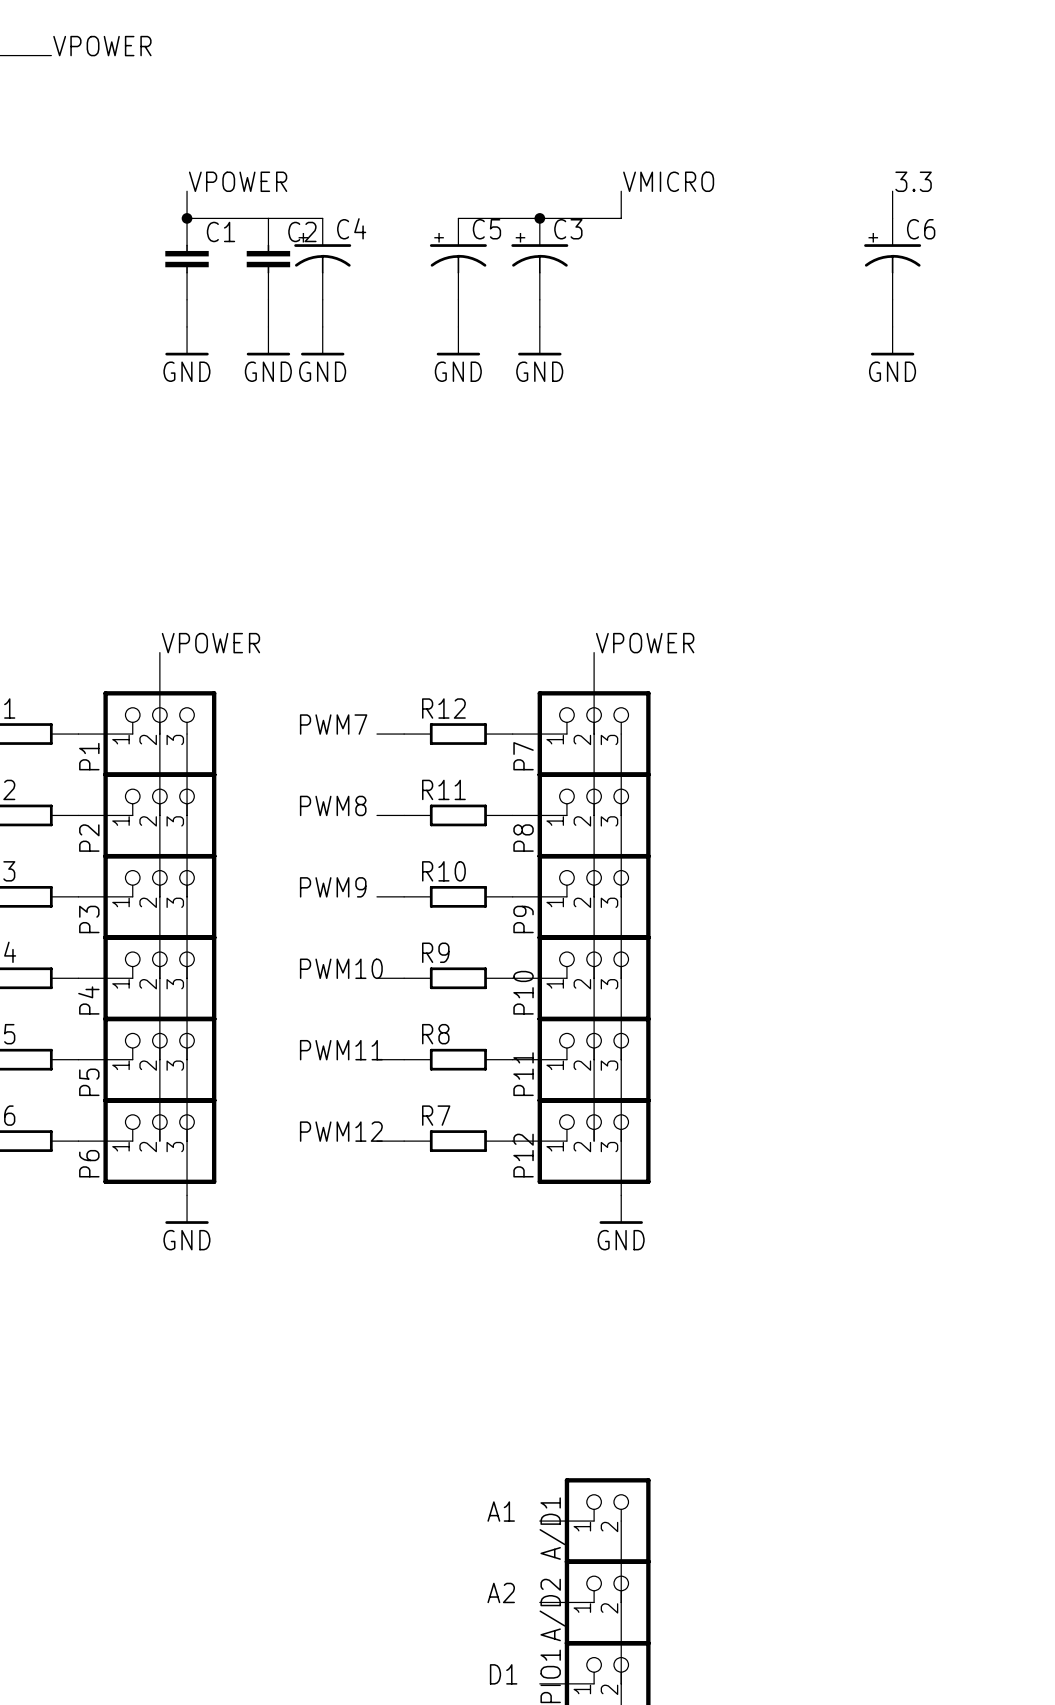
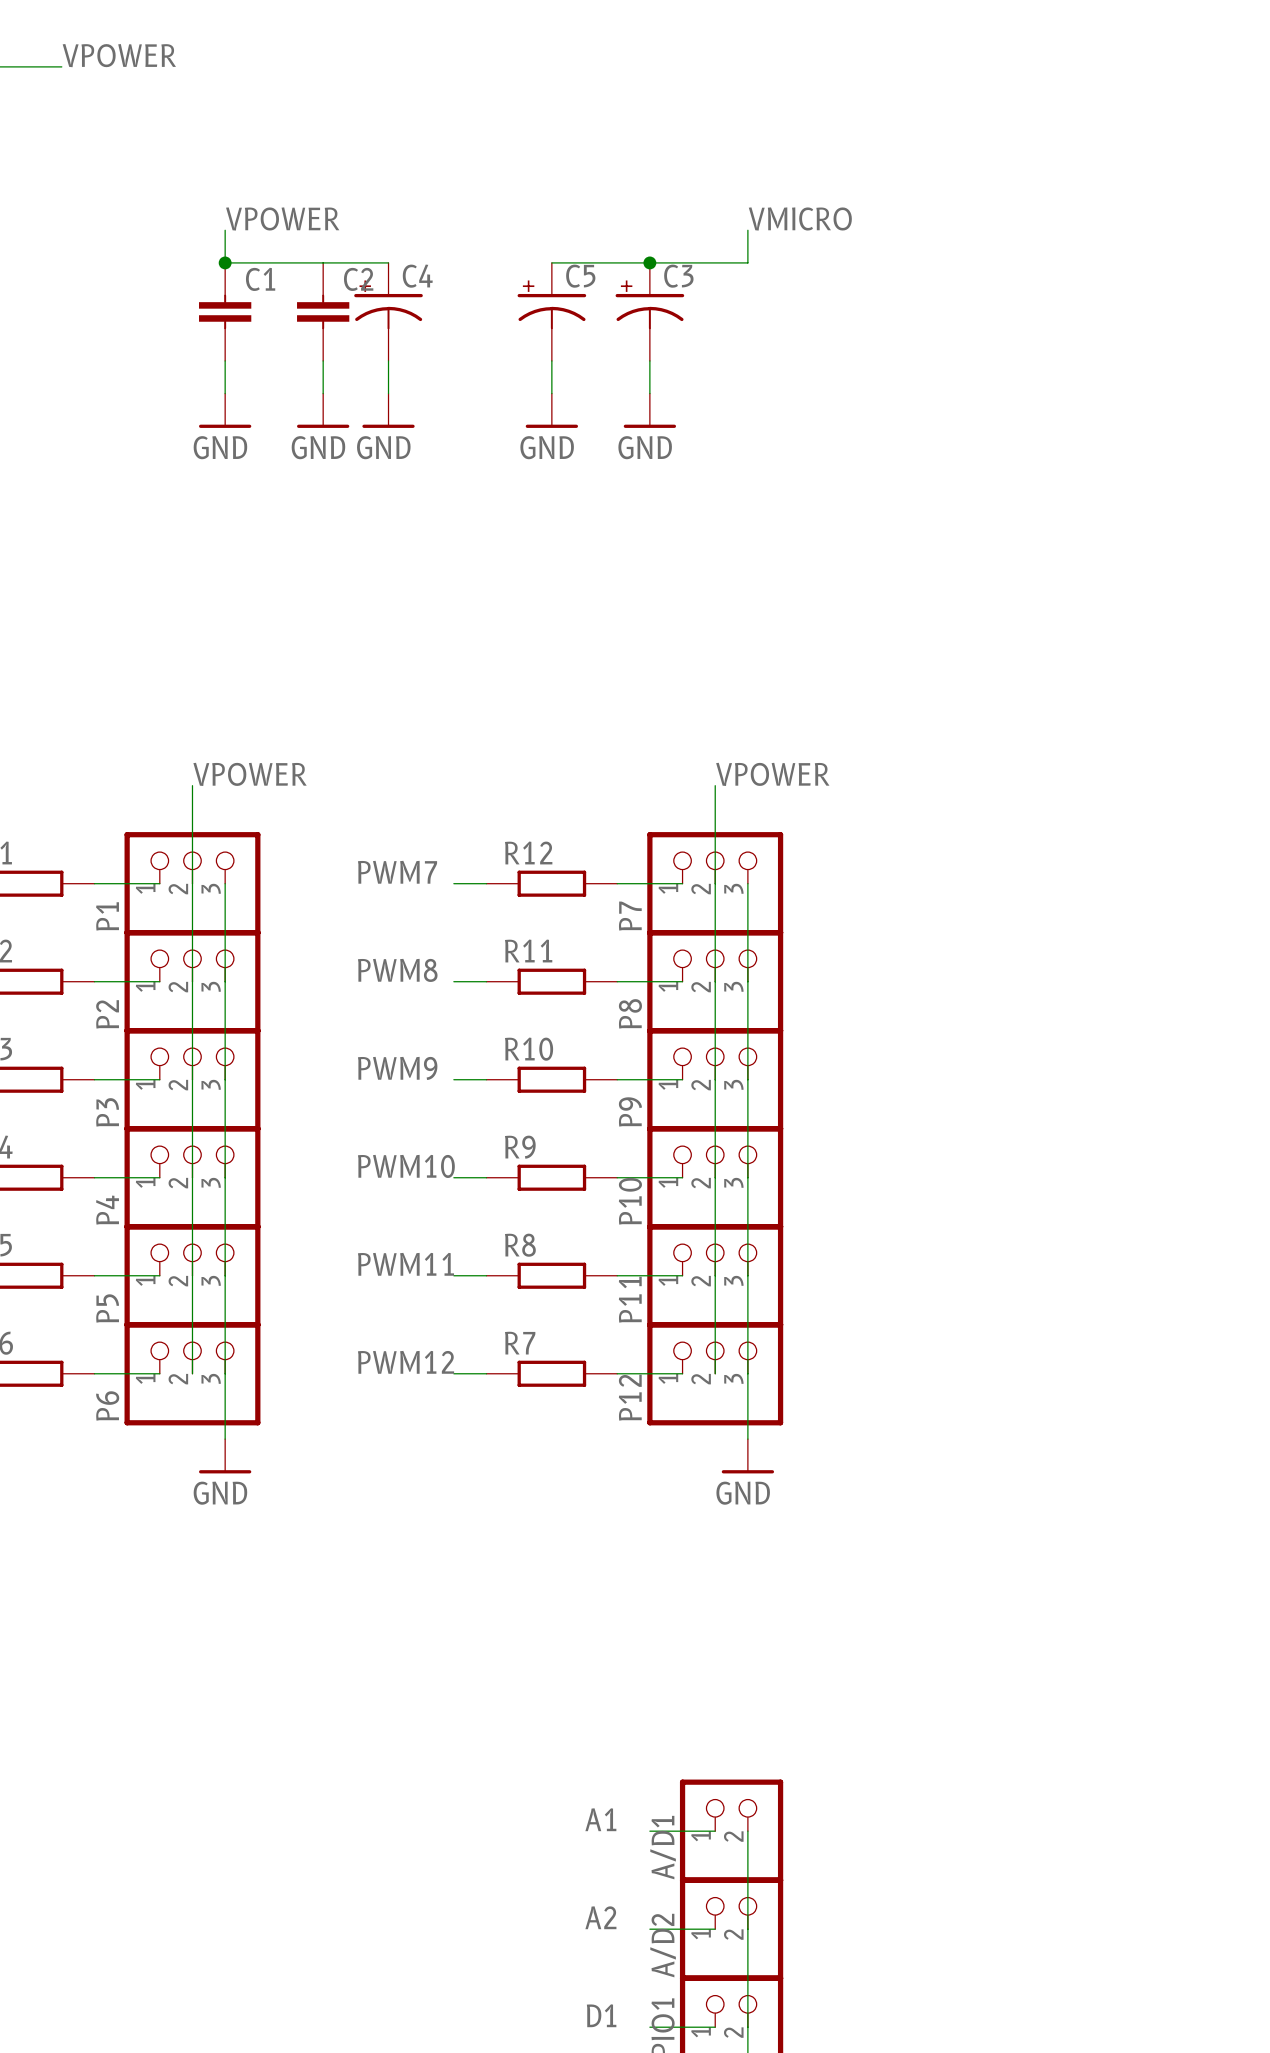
label: 3.3 (913, 181) -> none
wire: (892, 191) (892, 218) -> none
C6: (892, 259) -> none
wire: (892, 299) (892, 326) -> none
power symbol: GND (892, 341) -> none

